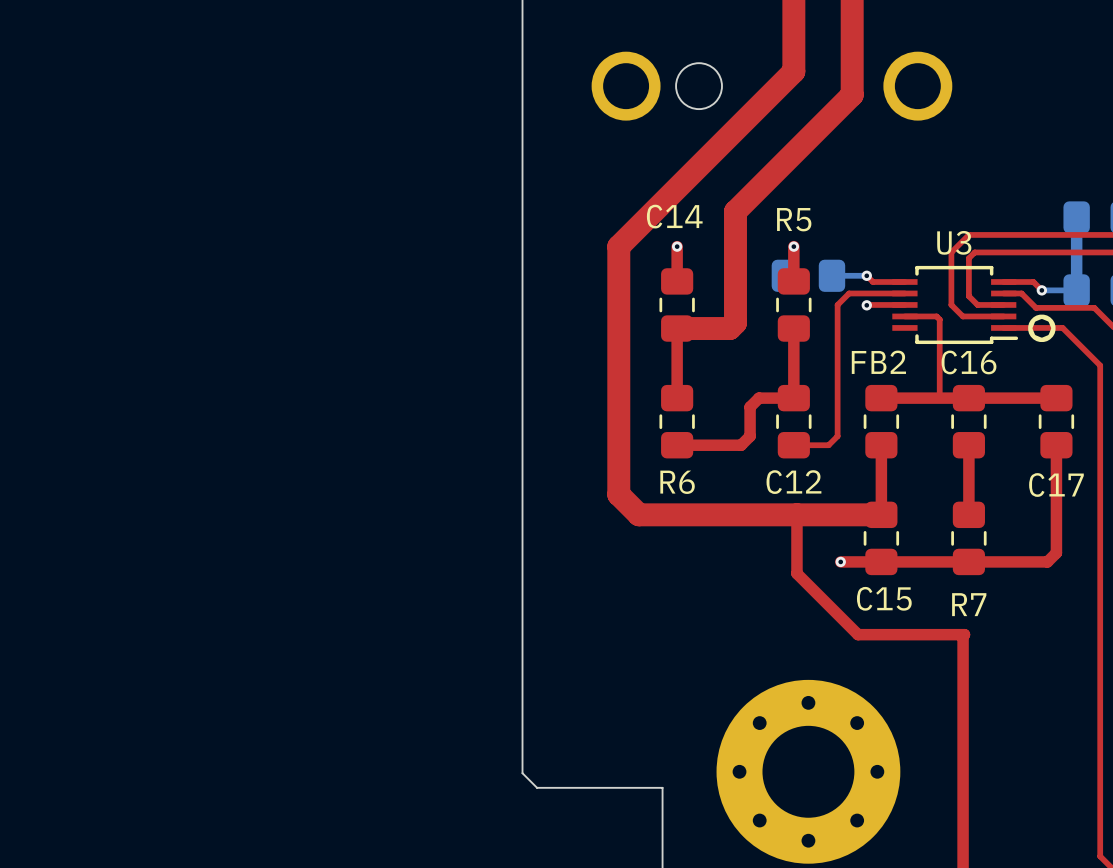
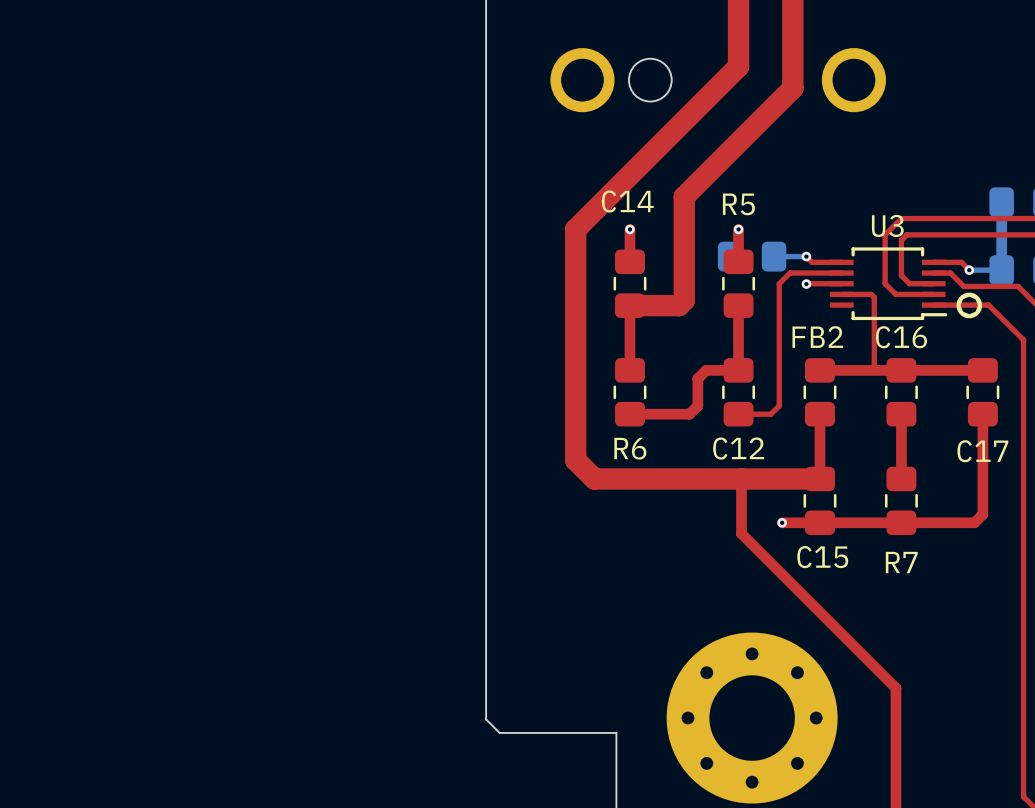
top track: (858, 634) (964, 634) (963, 739) -> (798, 590) (896, 688)

